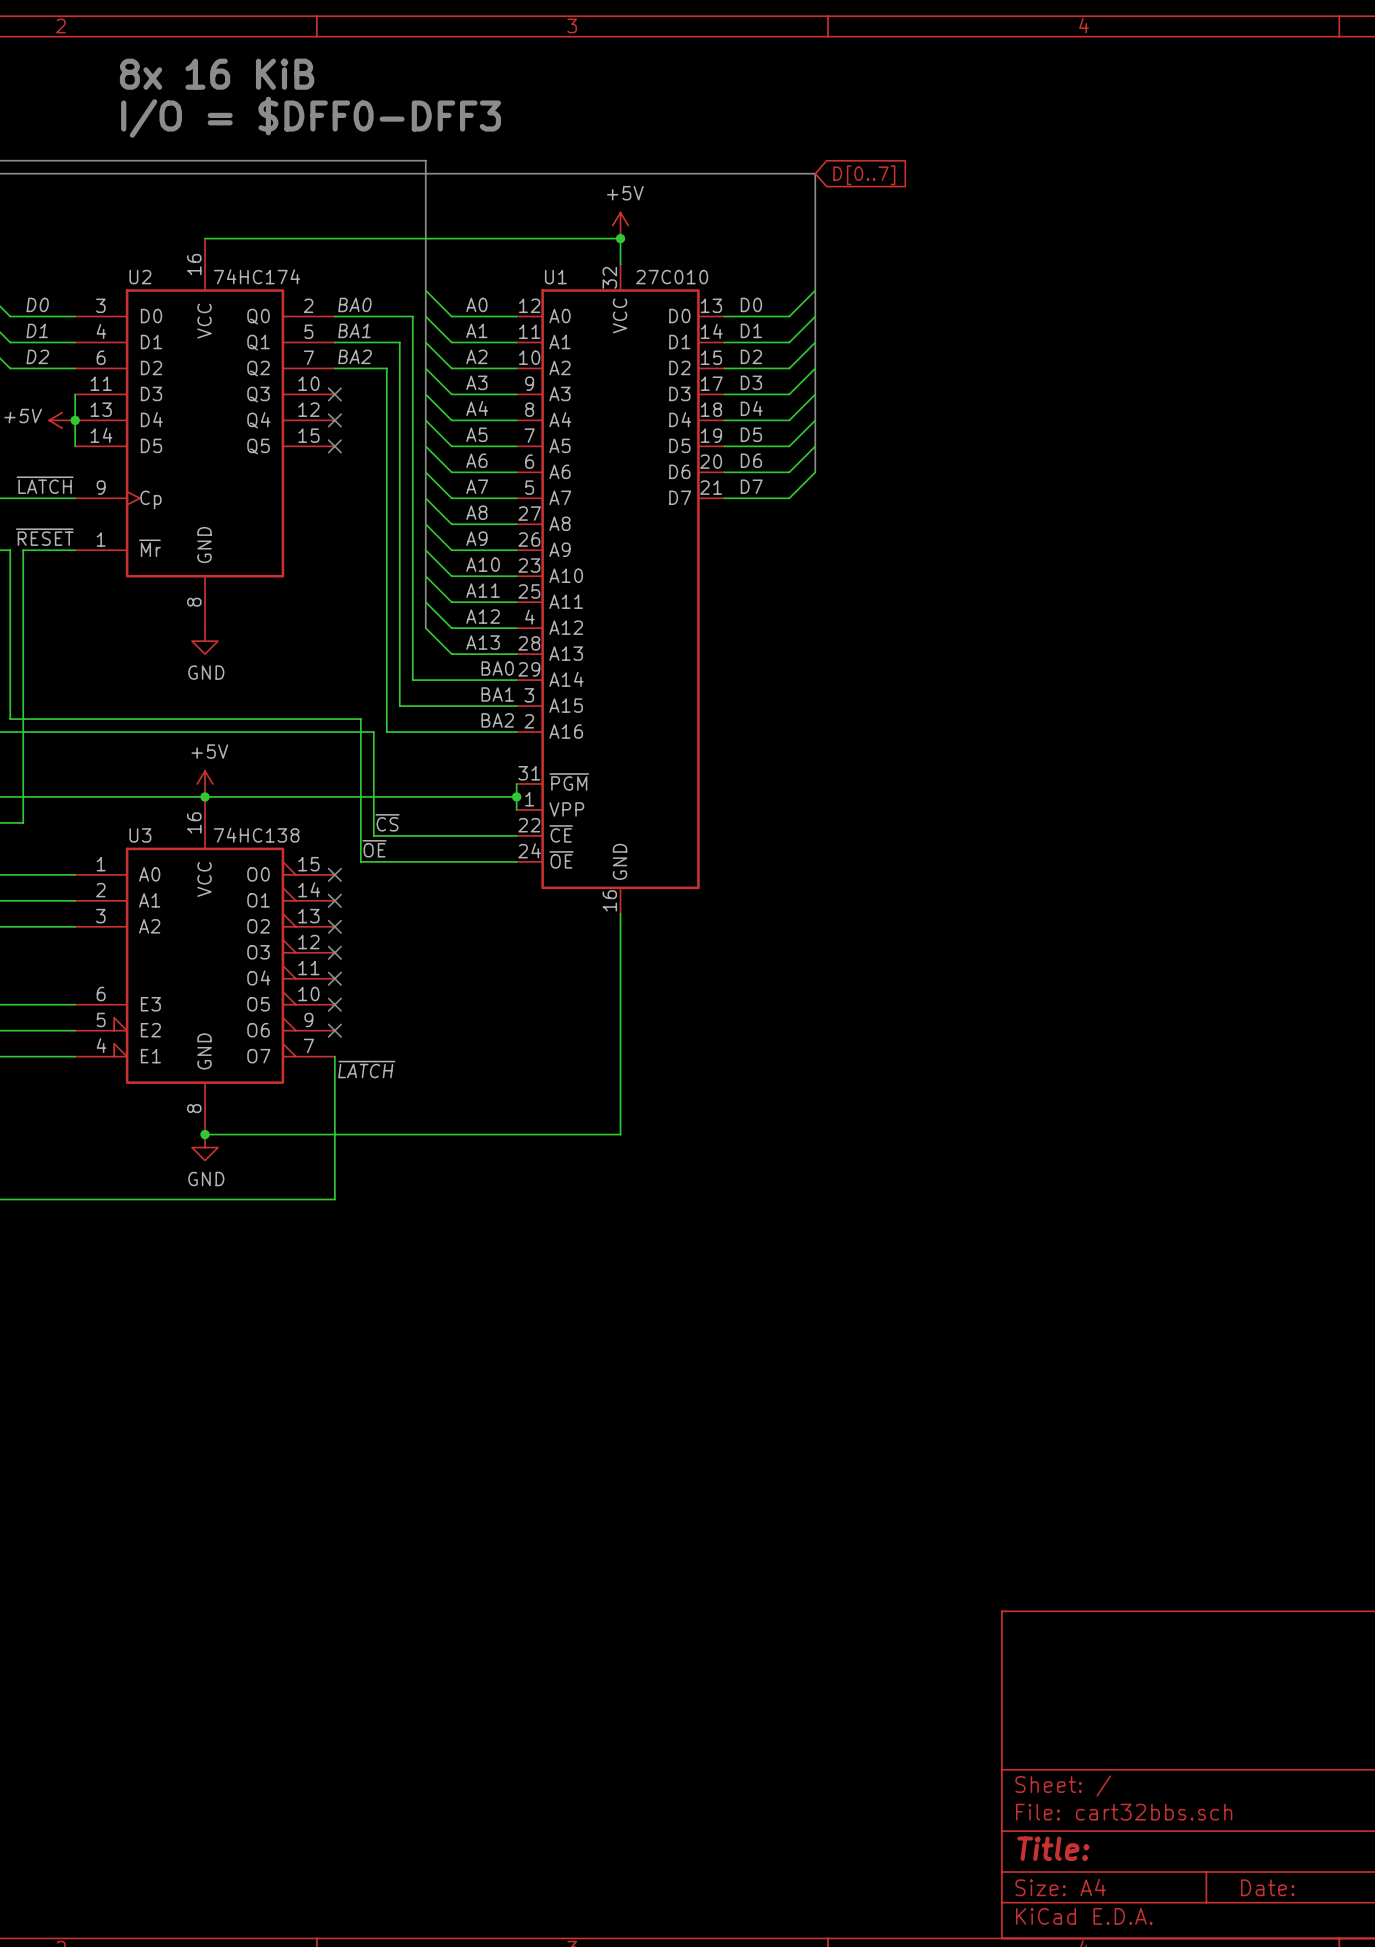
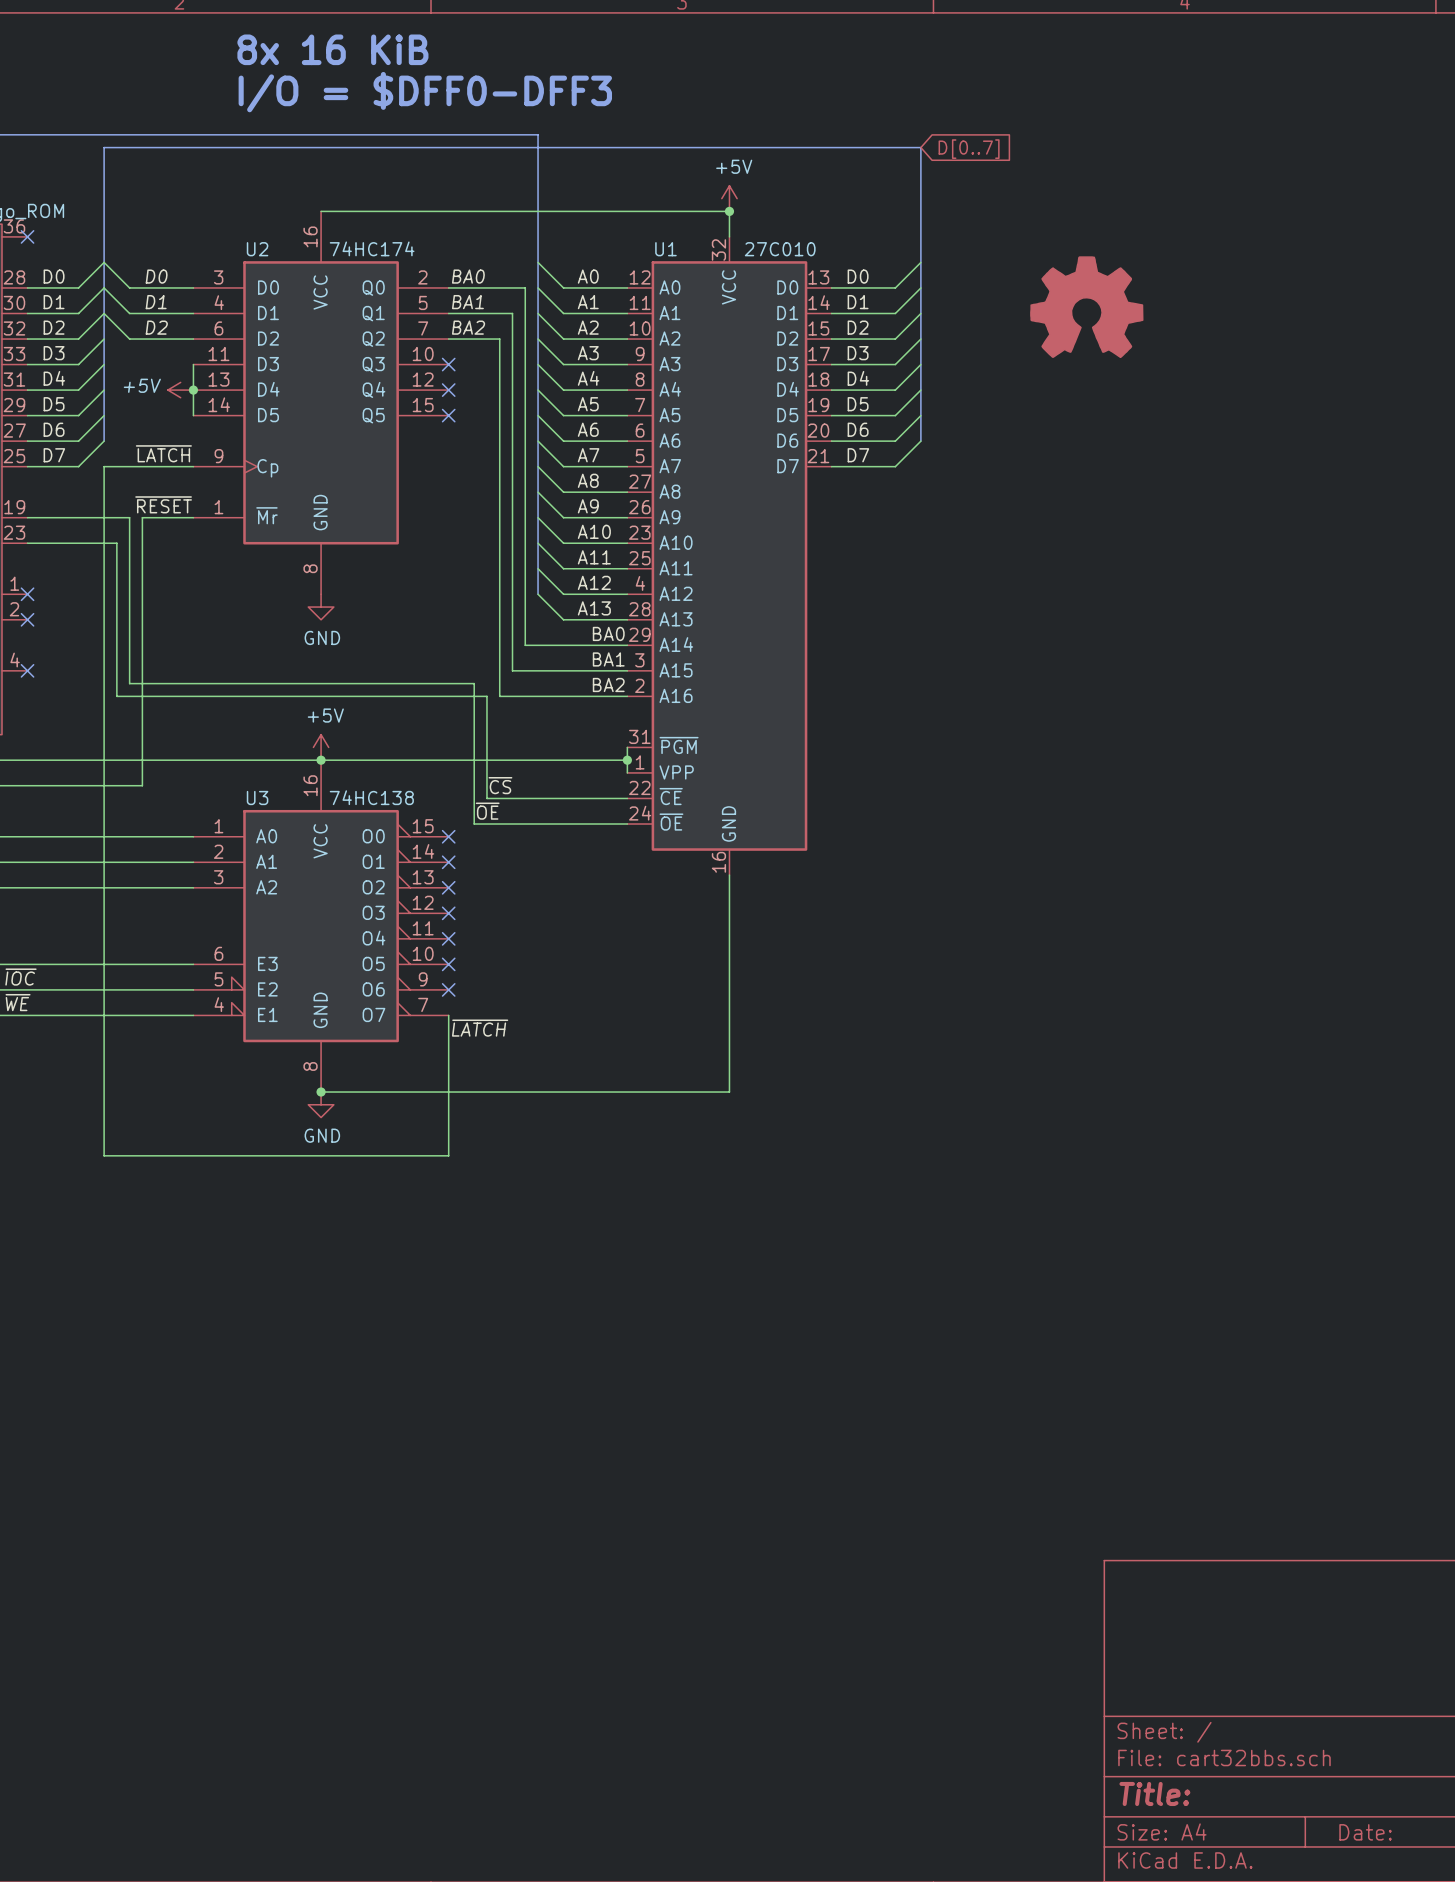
part: none -> (1086, 307)

